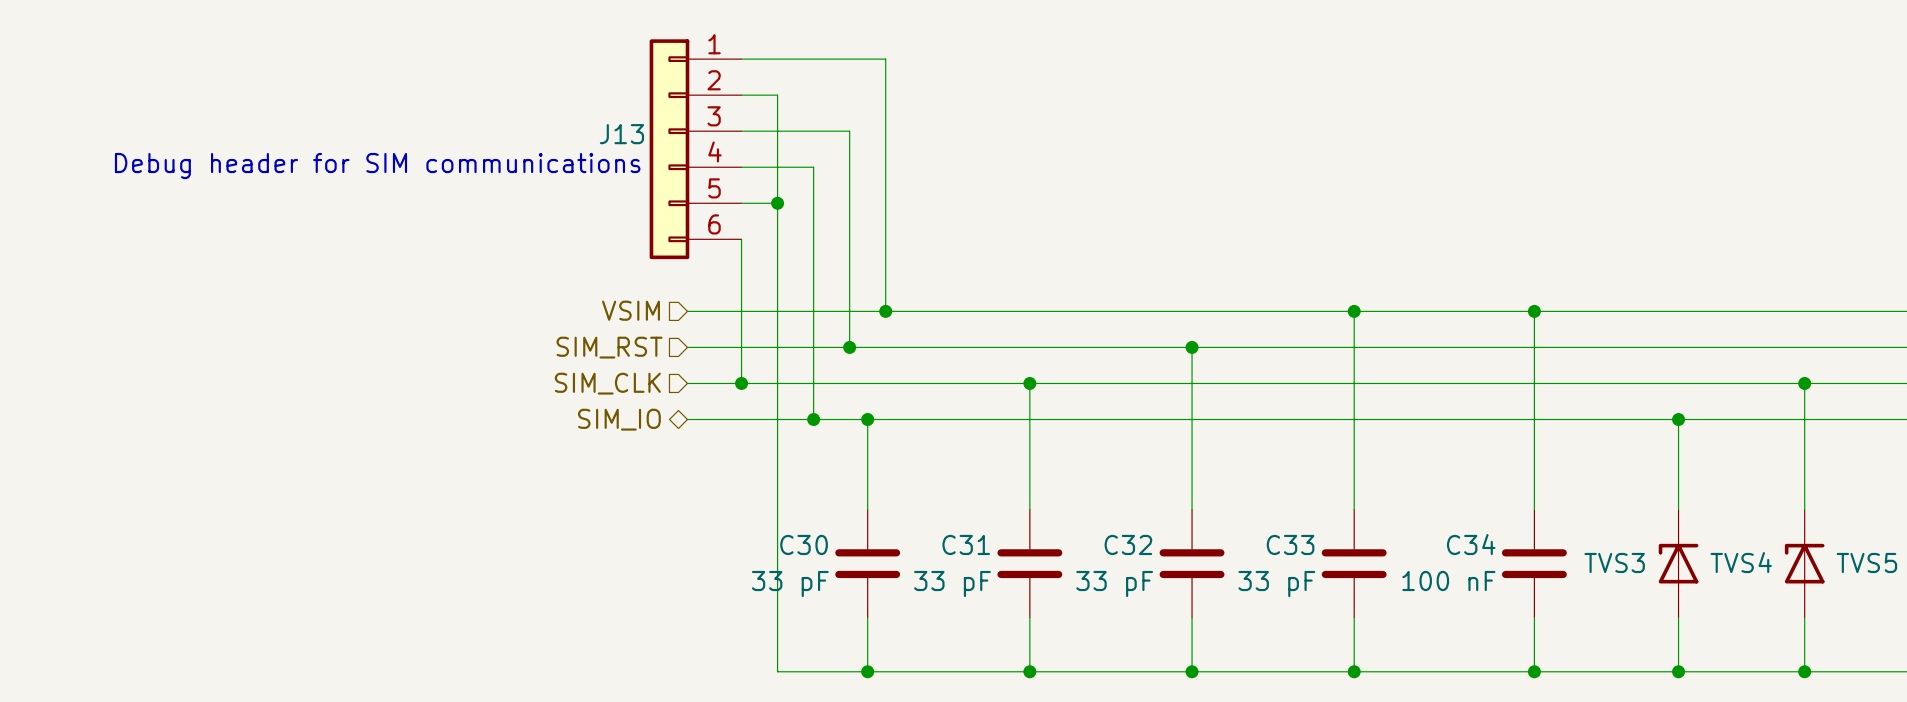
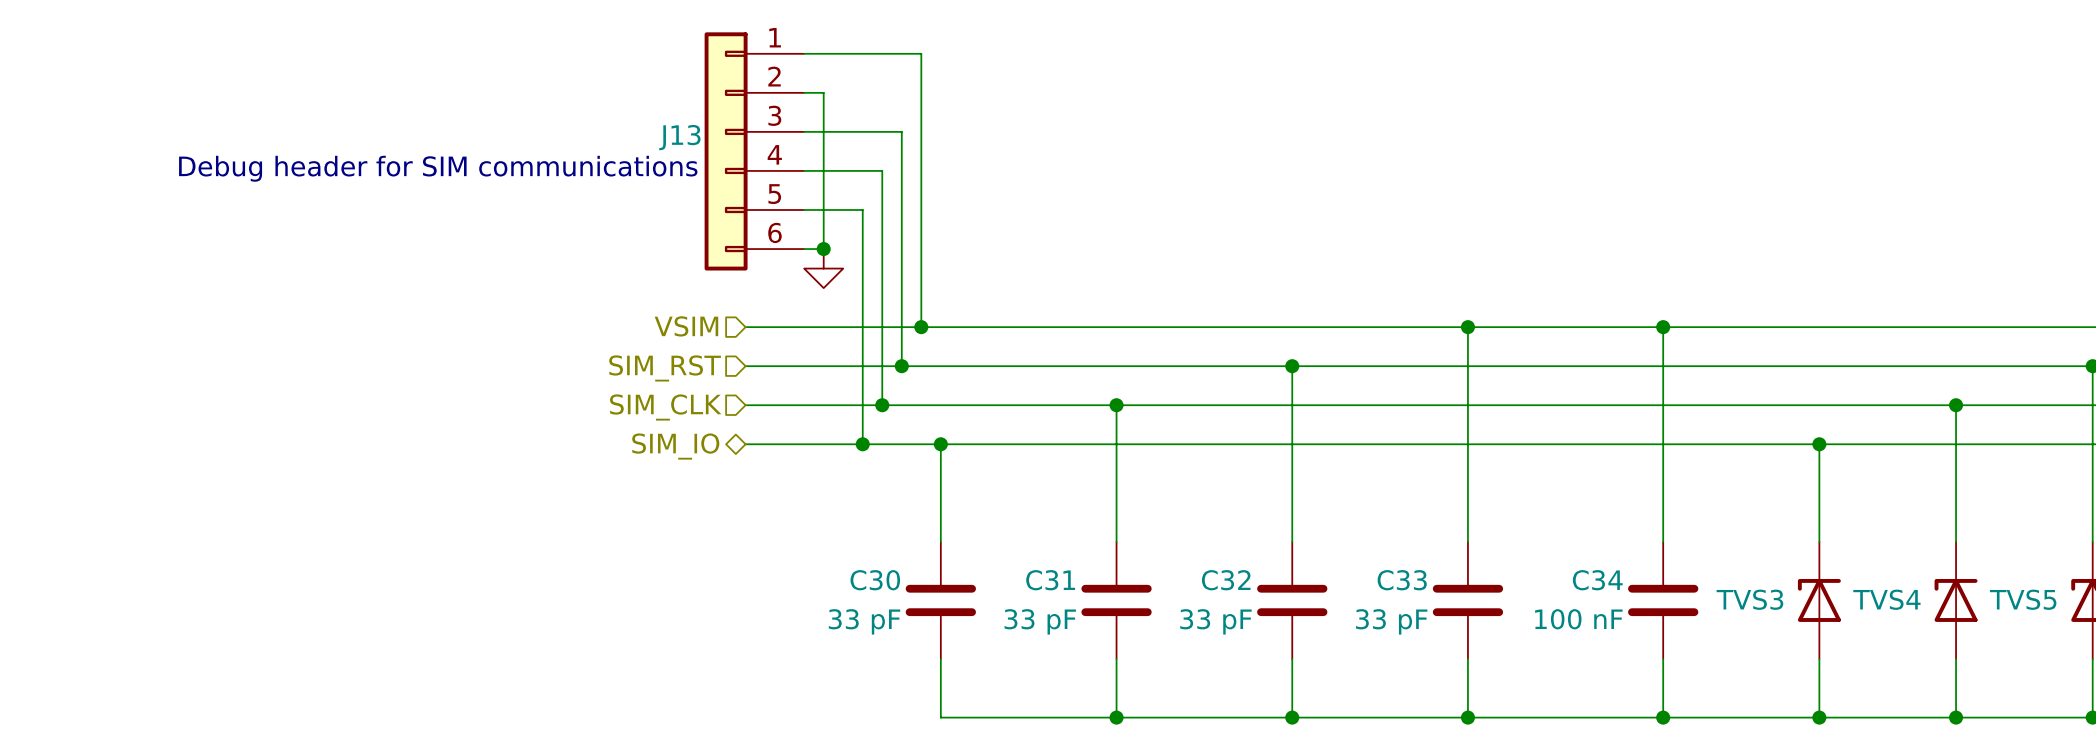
wire: (849, 59) (885, 59) (885, 311) -> none
wire: (759, 95) (777, 95) (777, 671) (867, 671) -> none
wire: (831, 131) (849, 131) -> (921, 53) (921, 131)
wire: none -> (901, 131) (901, 366)
wire: none -> (843, 209) (862, 209) (862, 444)
junction position: (777, 203) -> (823, 249)
wire: (741, 239) (741, 383) -> (804, 249) (823, 249) (823, 92)
power symbol: none -> (823, 268)
wire: (849, 311) (849, 347) -> none
junction: none -> (921, 327)
junction: (885, 311) -> none
junction: none -> (901, 366)
junction: (849, 347) -> none
junction: (741, 383) -> none
wire: (813, 383) (813, 419) -> none
junction: none -> (882, 405)
junction: none -> (862, 444)
junction: (813, 419) -> none
junction: (867, 671) -> none

